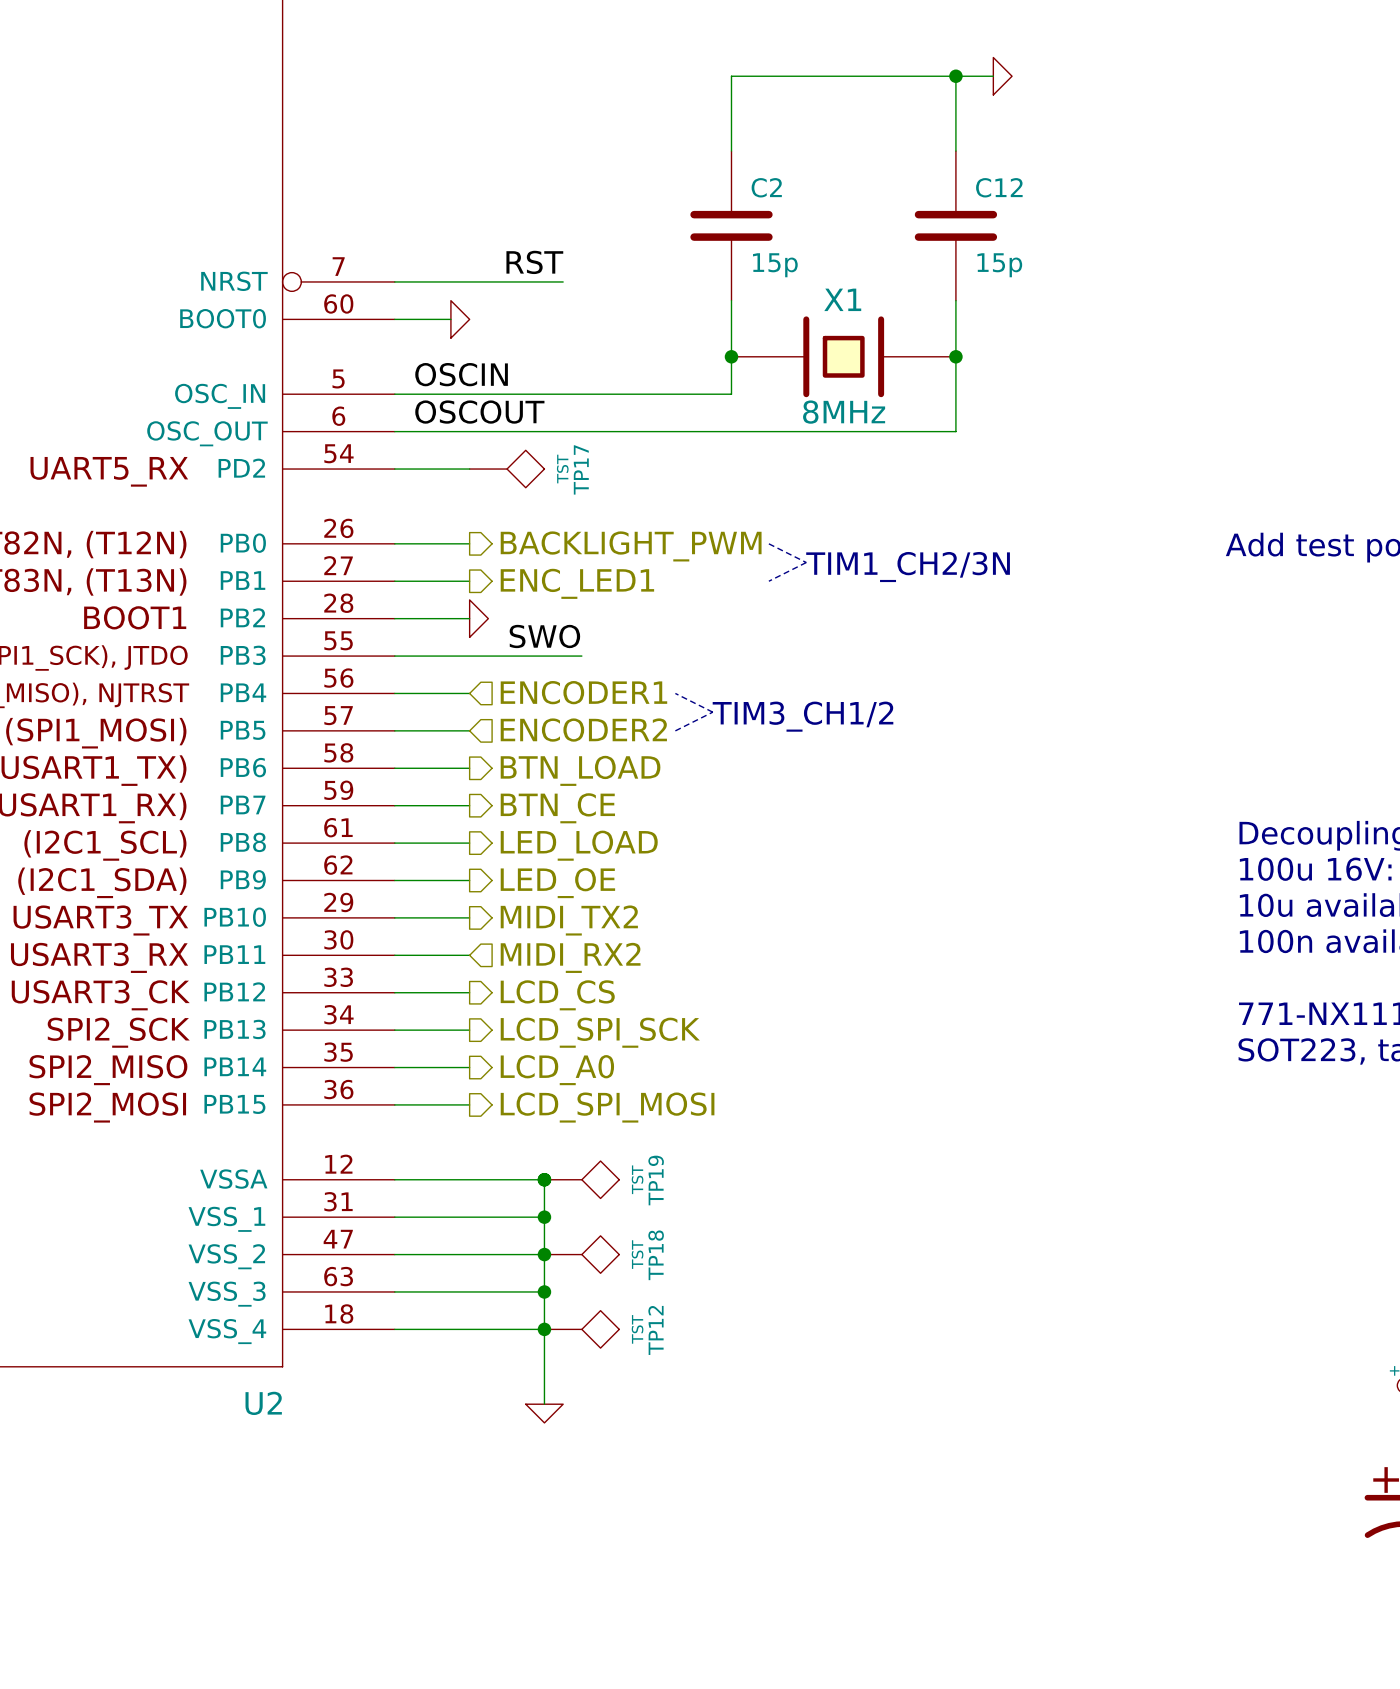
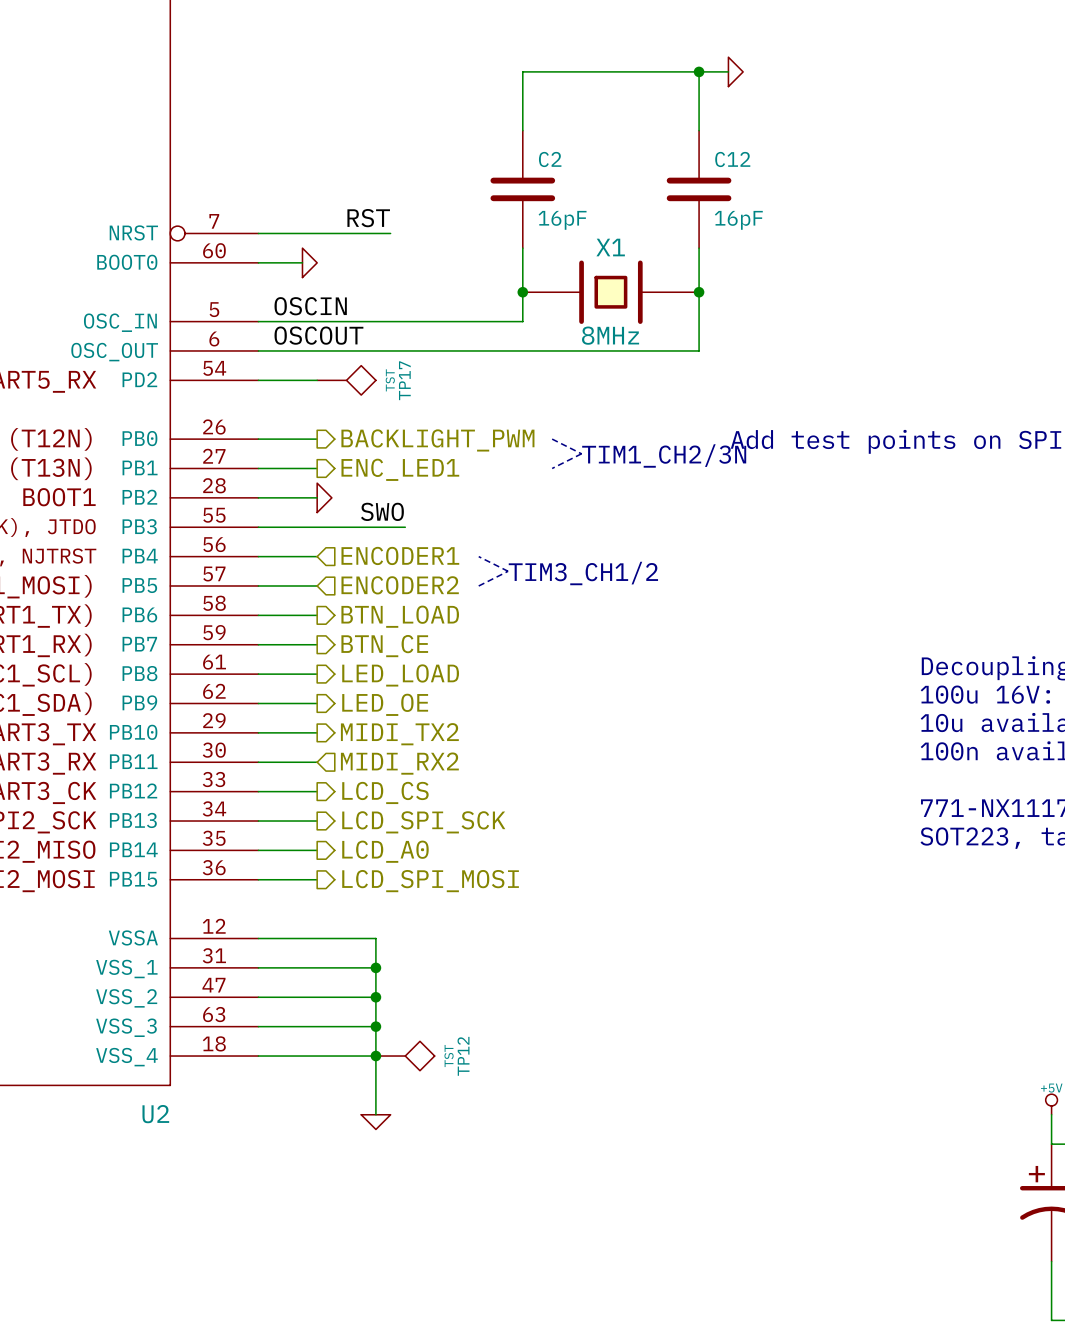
C2 value: 15p (775, 265) -> 16pF (562, 220)
C12 value: 15p (999, 265) -> 16pF (738, 220)
junction: (544, 1179) -> none
TP19: TST (581, 1179) -> none
TP18: TST (581, 1254) -> none

